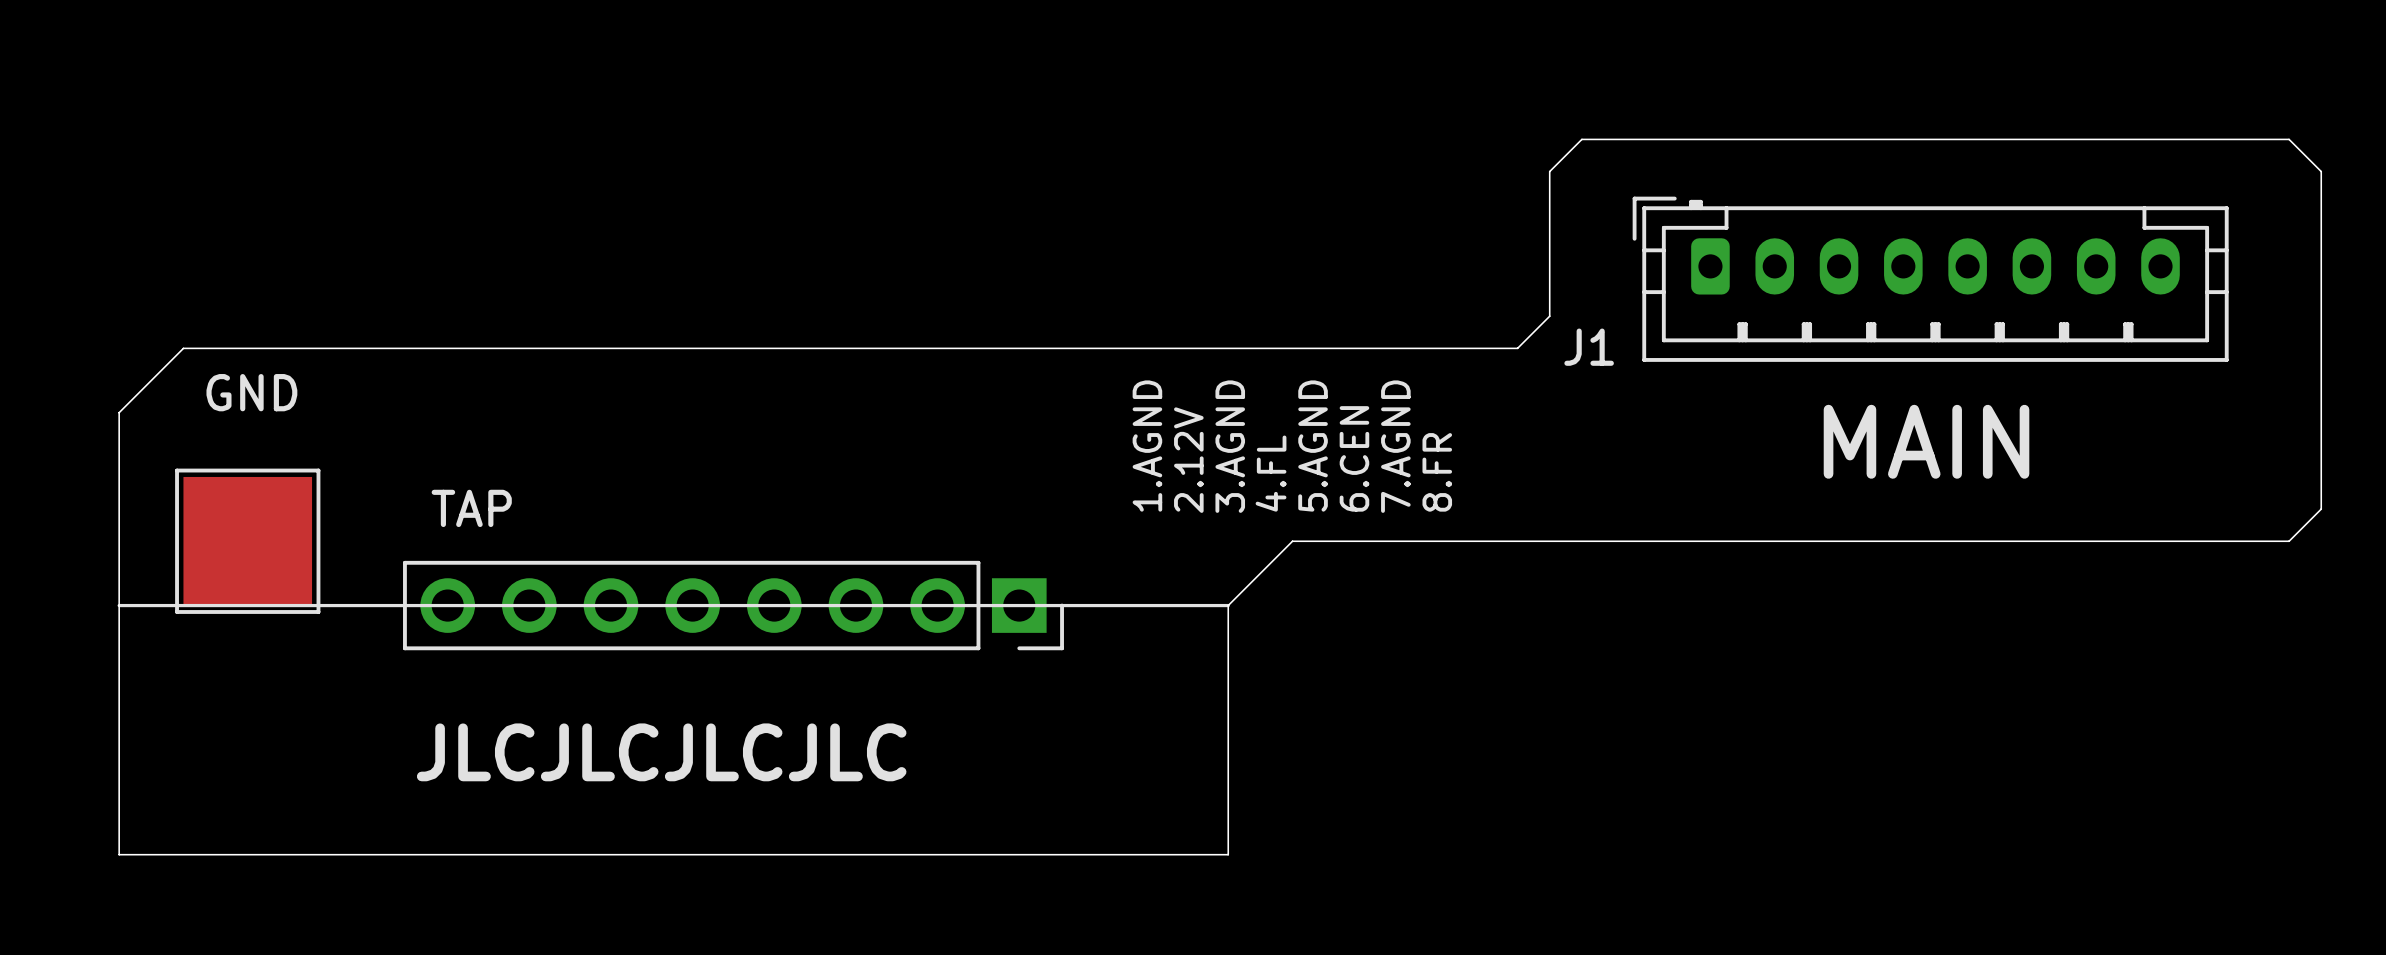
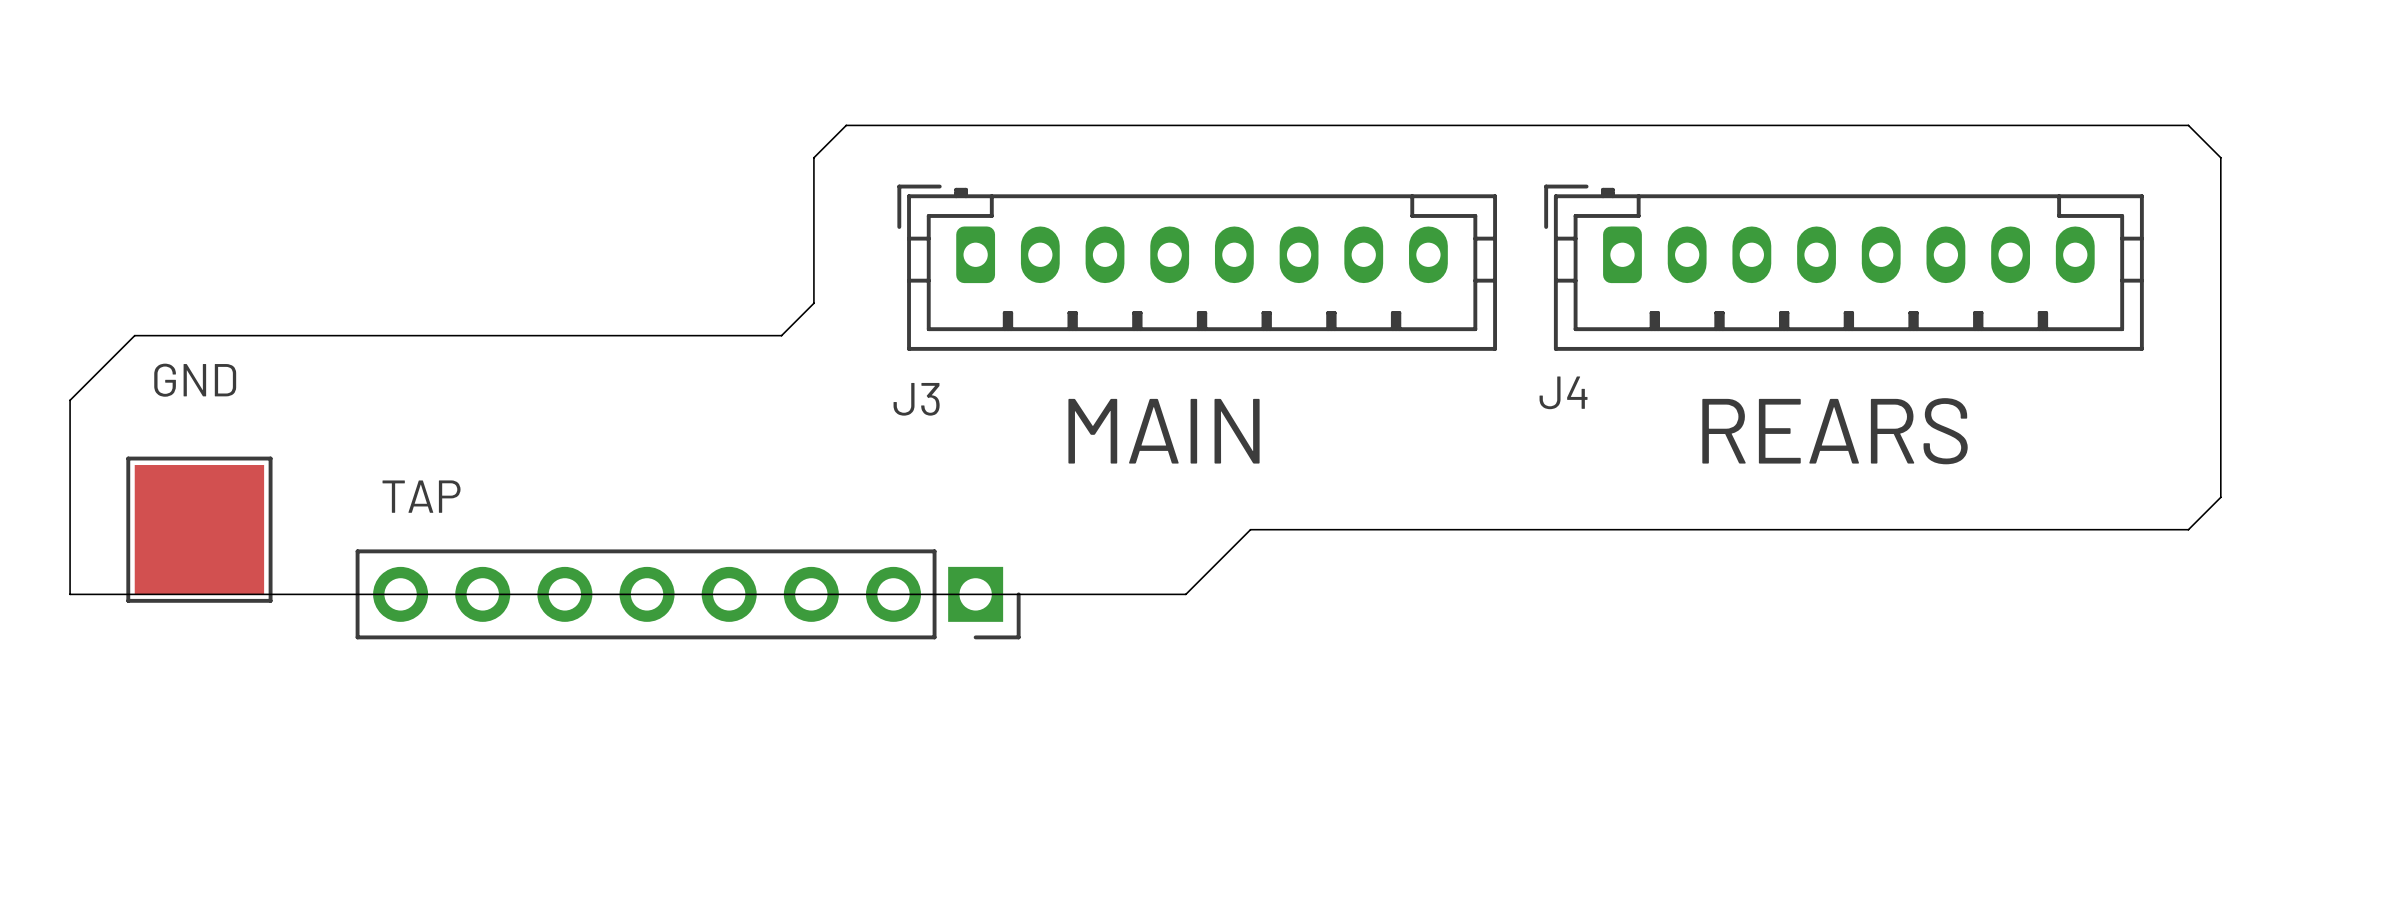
board edge: (1581, 139) (1549, 171) (1549, 316) (1517, 348) (826, 348) -> (1541, 125) (846, 125) (813, 157) (813, 303) (781, 335)
board edge: (2224, 139) (2289, 139) (2321, 171) (2321, 509) (2289, 541) (2224, 541) -> (2188, 125) (2220, 157) (2220, 497) (2188, 529)
J1: (1930, 279) -> none
J3: none -> (1197, 267)
J4: none -> (1844, 267)
text position: MAIN (1926, 441) -> MAIN (1164, 431)
text: none -> REARS (1835, 431)
text: 1.AGND (1147, 446) -> none
text: 3.AGND (1230, 446) -> none
text: 5.AGND (1313, 446) -> none
text: 7.AGND (1395, 446) -> none
text: 6.CEN (1354, 458) -> none
text: 2.12V (1188, 460) -> none
text: 8.FR (1437, 472) -> none
text: 4.FL (1271, 473) -> none
line: (119, 605) (1228, 605) -> none
board edge: (119, 605) (119, 854) (1228, 854) (1228, 605) -> (70, 594) (1185, 594)
text: JLCJLCJLCJLC (661, 752) -> none

